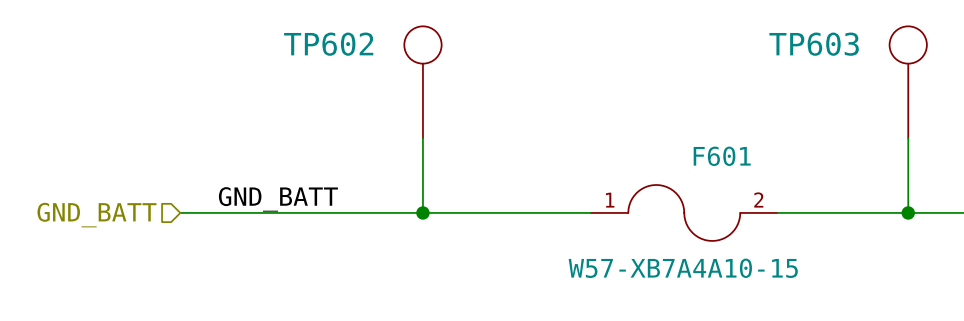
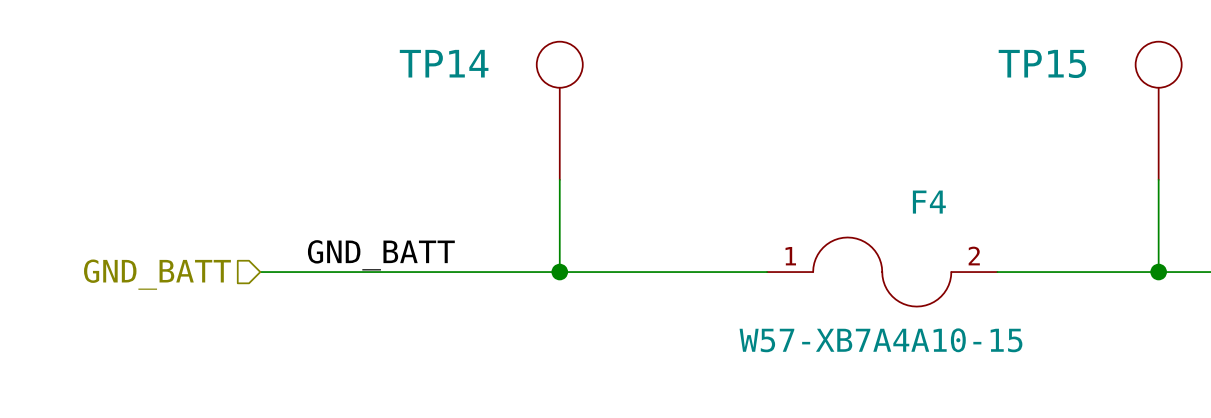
TP602 name: TP602 (328, 44) -> TP14 (444, 63)
TP603 name: TP603 (814, 44) -> TP15 (1042, 63)
F601 name: F601 (722, 156) -> F4 (929, 202)

